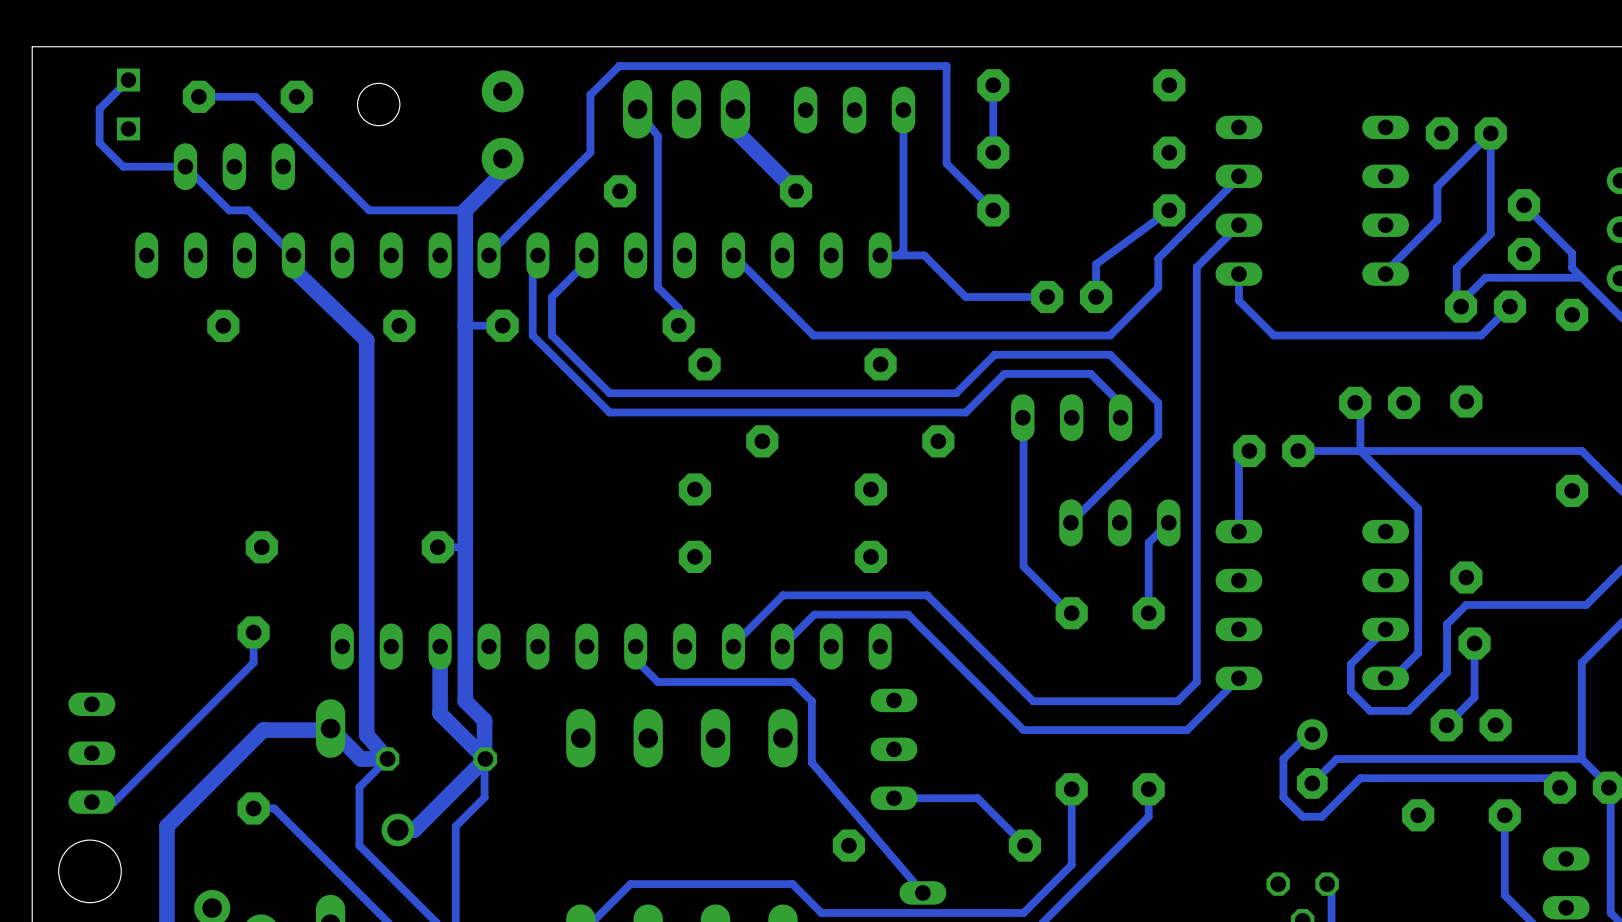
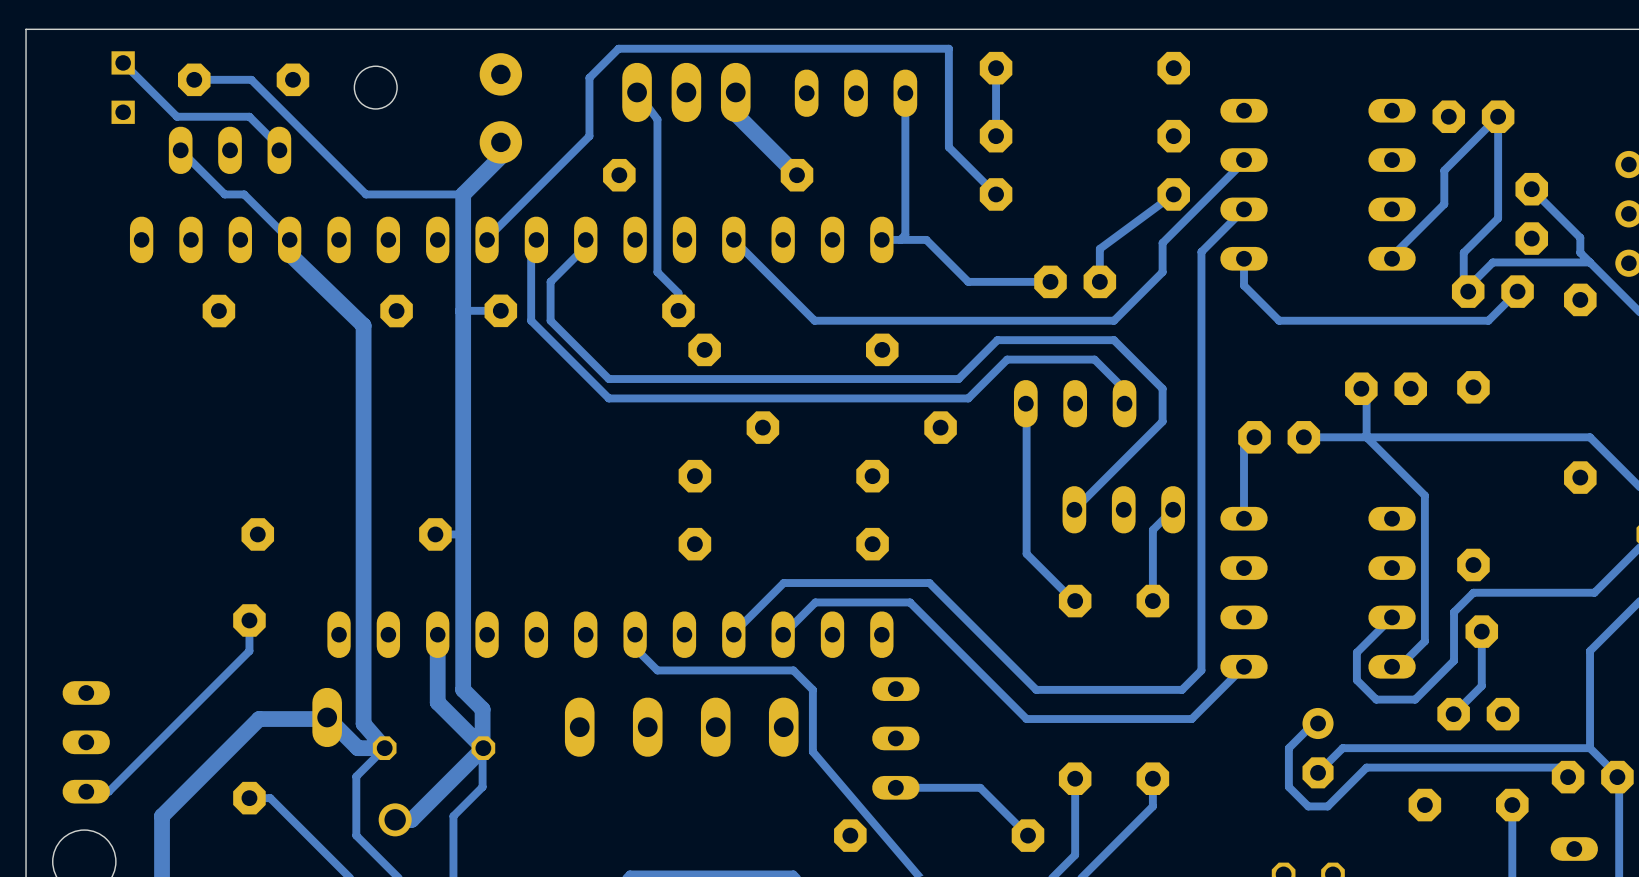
track: (128, 80) (99, 108) (99, 143) (123, 166) (185, 166) -> (123, 62) (176, 116) (249, 116) (279, 146) (279, 150)

